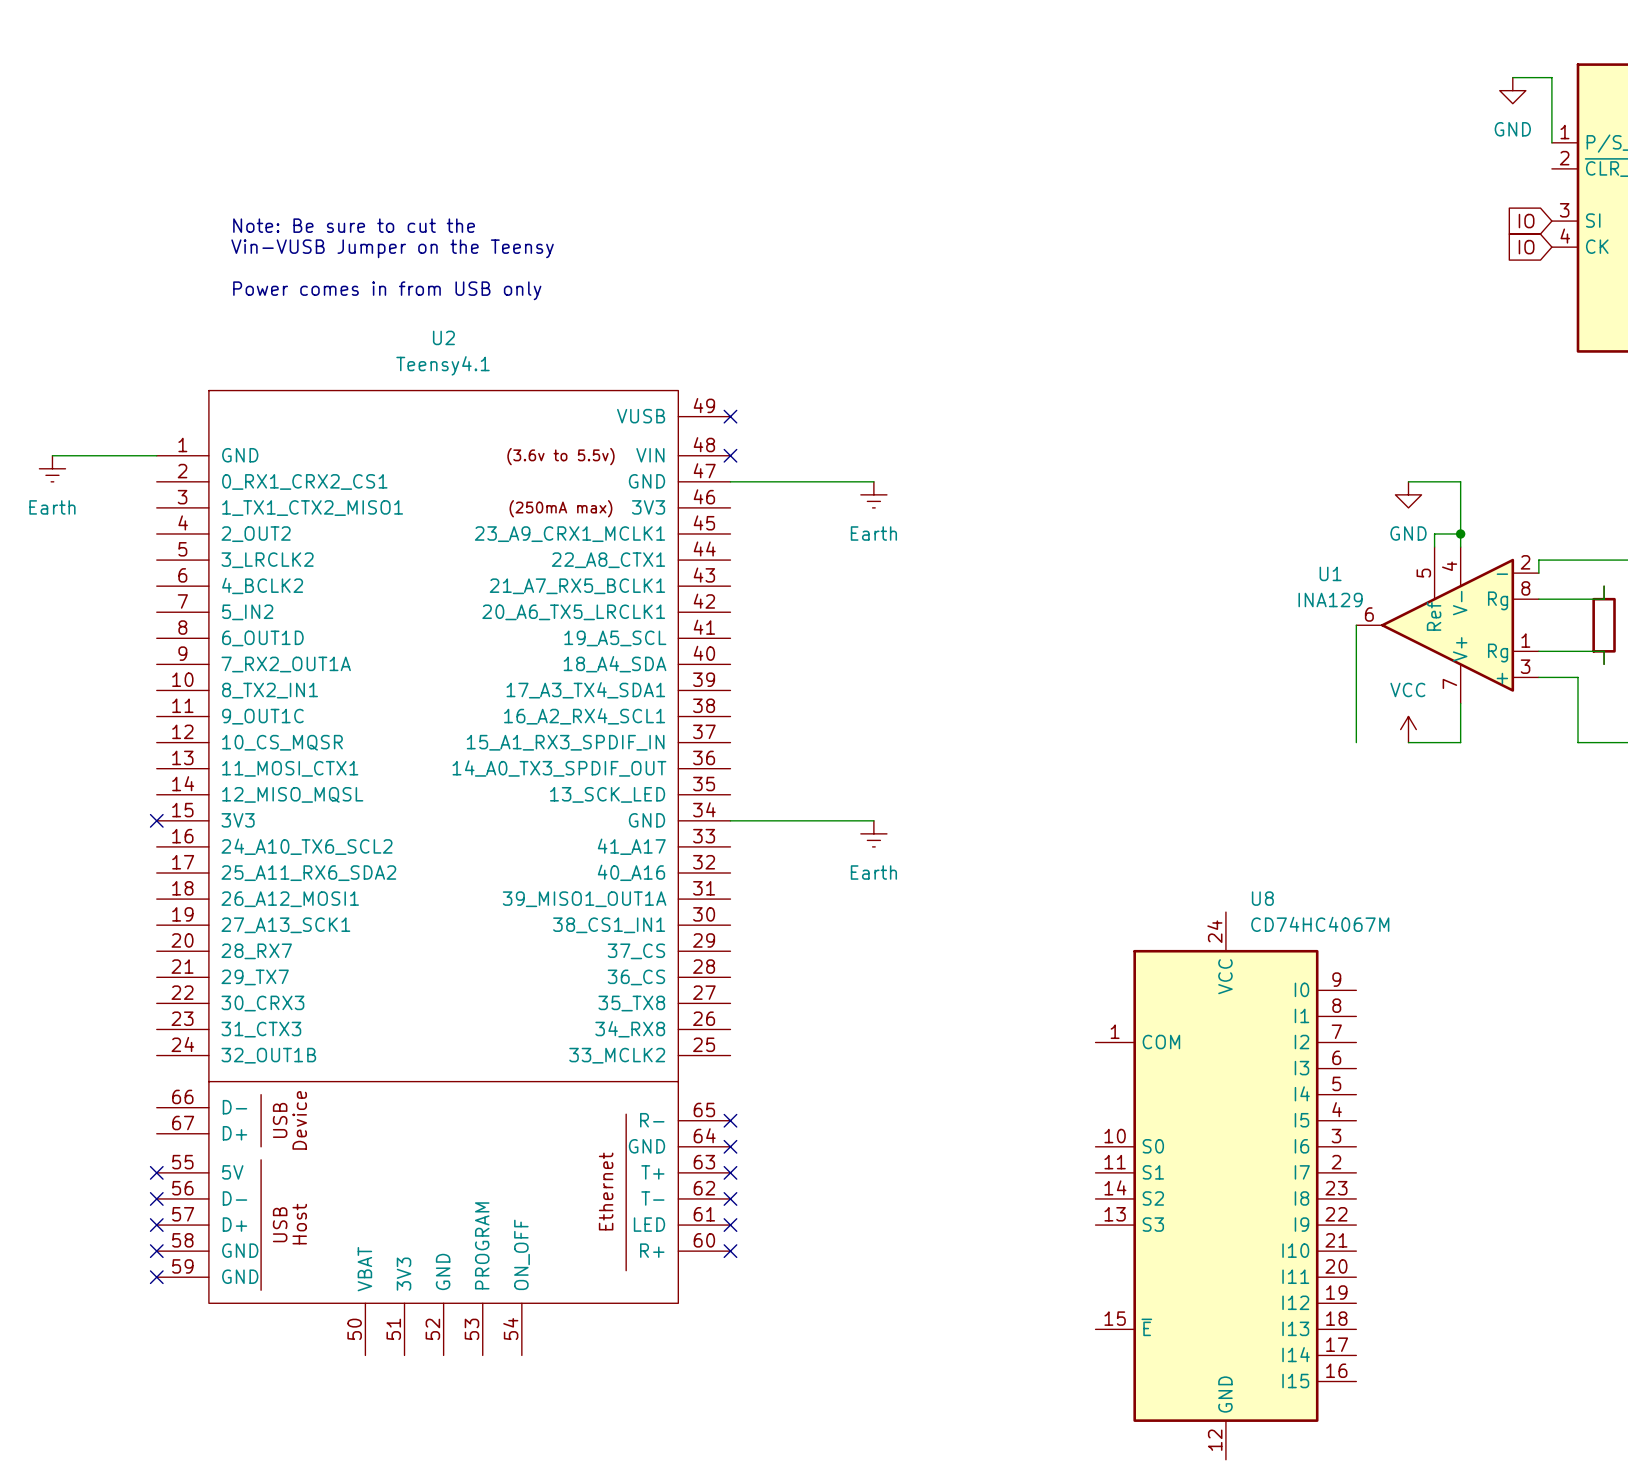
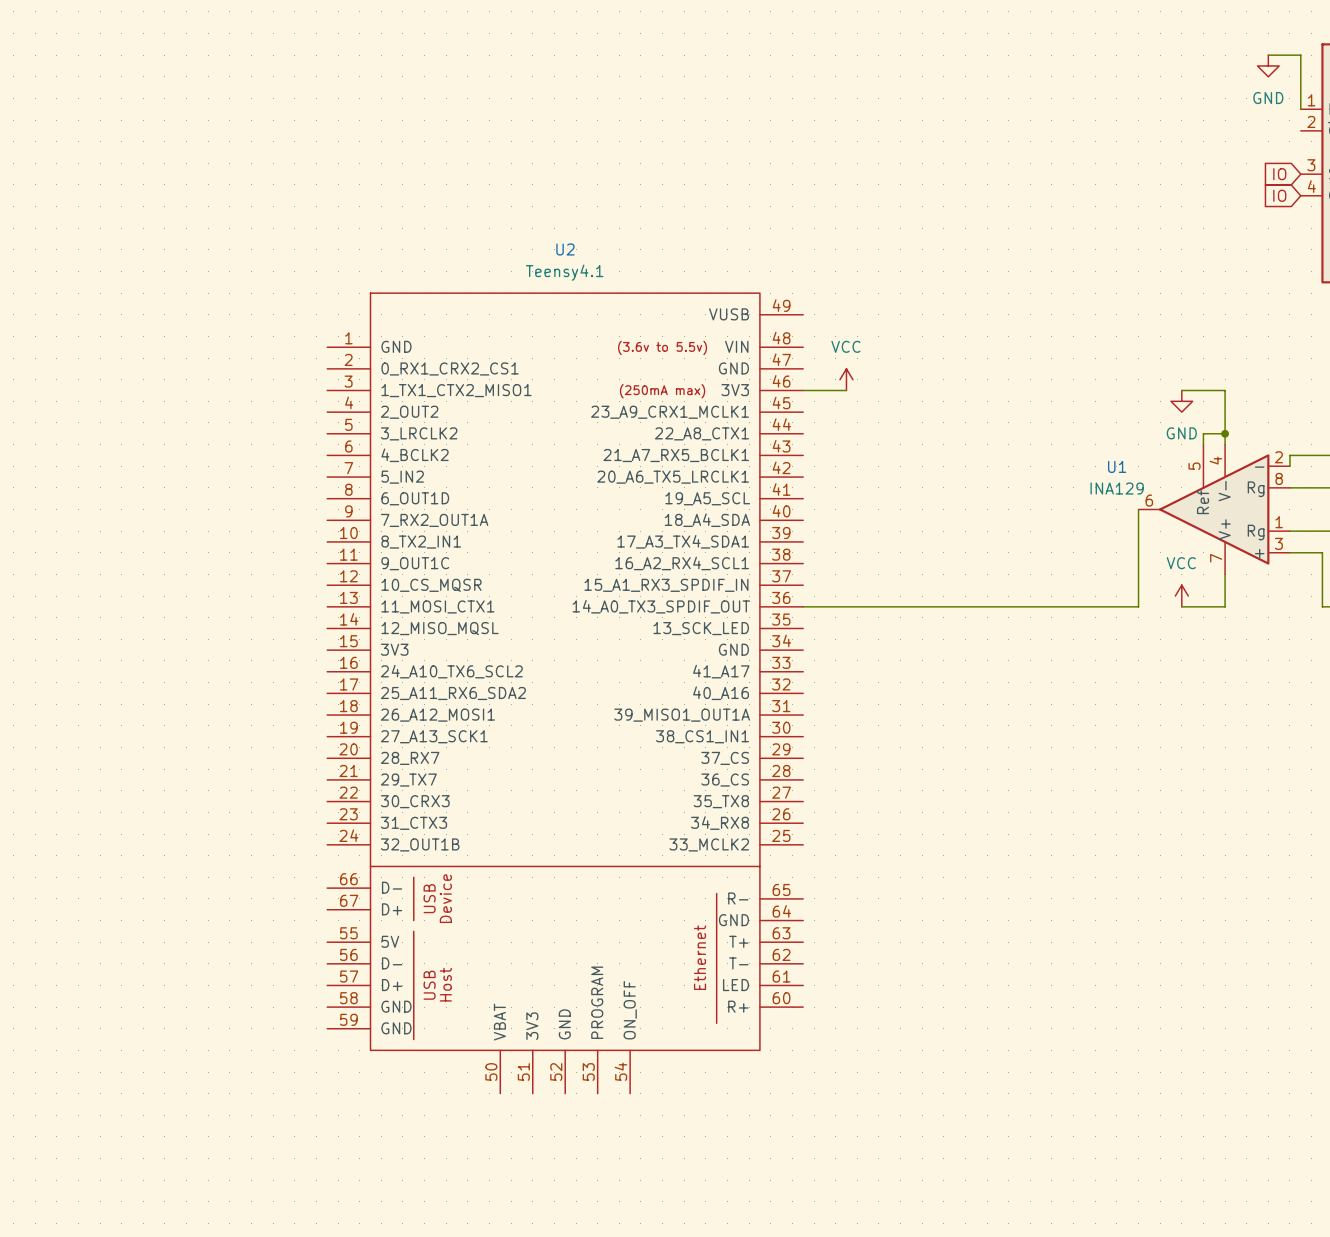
text: Note: Be sure to cut the (354, 225) -> none
text: Vin-VUSB Jumper on the Teensy (392, 248) -> none
text: Power comes in from USB only (387, 290) -> none
no-connect mark: (730, 416) -> none
wire: (52, 455) (156, 455) -> none
no-connect mark: (730, 455) -> none
power symbol: Earth (52, 468) -> none
power symbol: none -> VCC (846, 379)
wire: (730, 481) (873, 481) -> none
wire: none -> (803, 390) (846, 390)
power symbol: Earth (873, 494) -> none
wire: none -> (803, 606) (1138, 606)
no-connect mark: (156, 820) -> none
wire: (730, 820) (873, 820) -> none
power symbol: Earth (873, 833) -> none
U2 position: (443, 872) -> (565, 693)
no-connect mark: (730, 1120) -> none
no-connect mark: (730, 1146) -> none
no-connect mark: (156, 1172) -> none
no-connect mark: (730, 1172) -> none
U8: CD74HC4067M (1225, 1185) -> none
no-connect mark: (156, 1198) -> none
no-connect mark: (730, 1198) -> none
no-connect mark: (156, 1225) -> none
no-connect mark: (730, 1225) -> none
no-connect mark: (156, 1251) -> none
no-connect mark: (730, 1251) -> none
no-connect mark: (156, 1277) -> none

